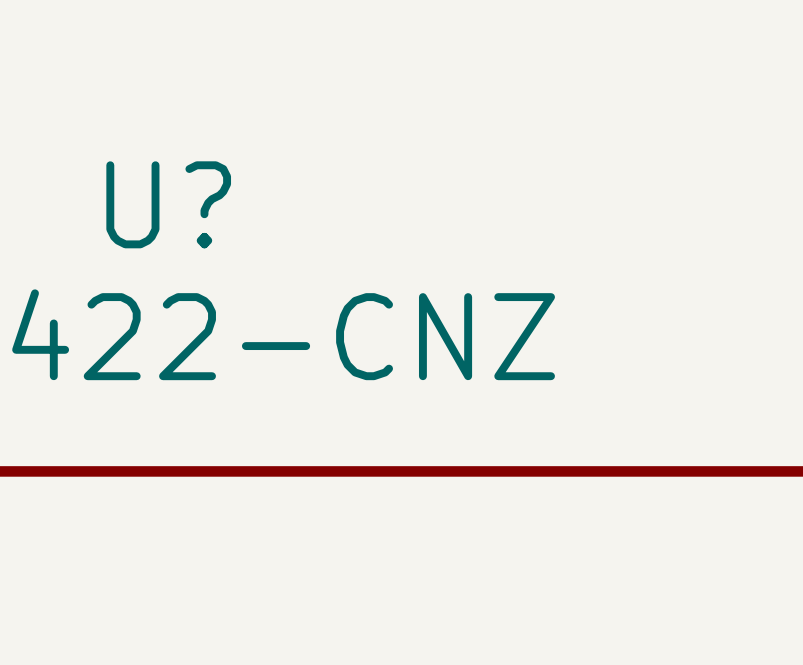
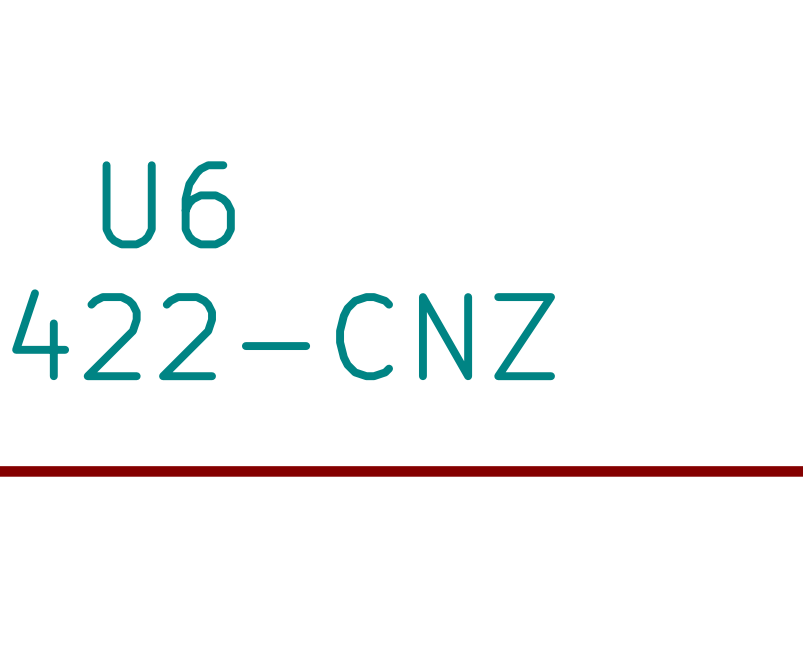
U? name: U? (168, 204) -> U6 (168, 204)

